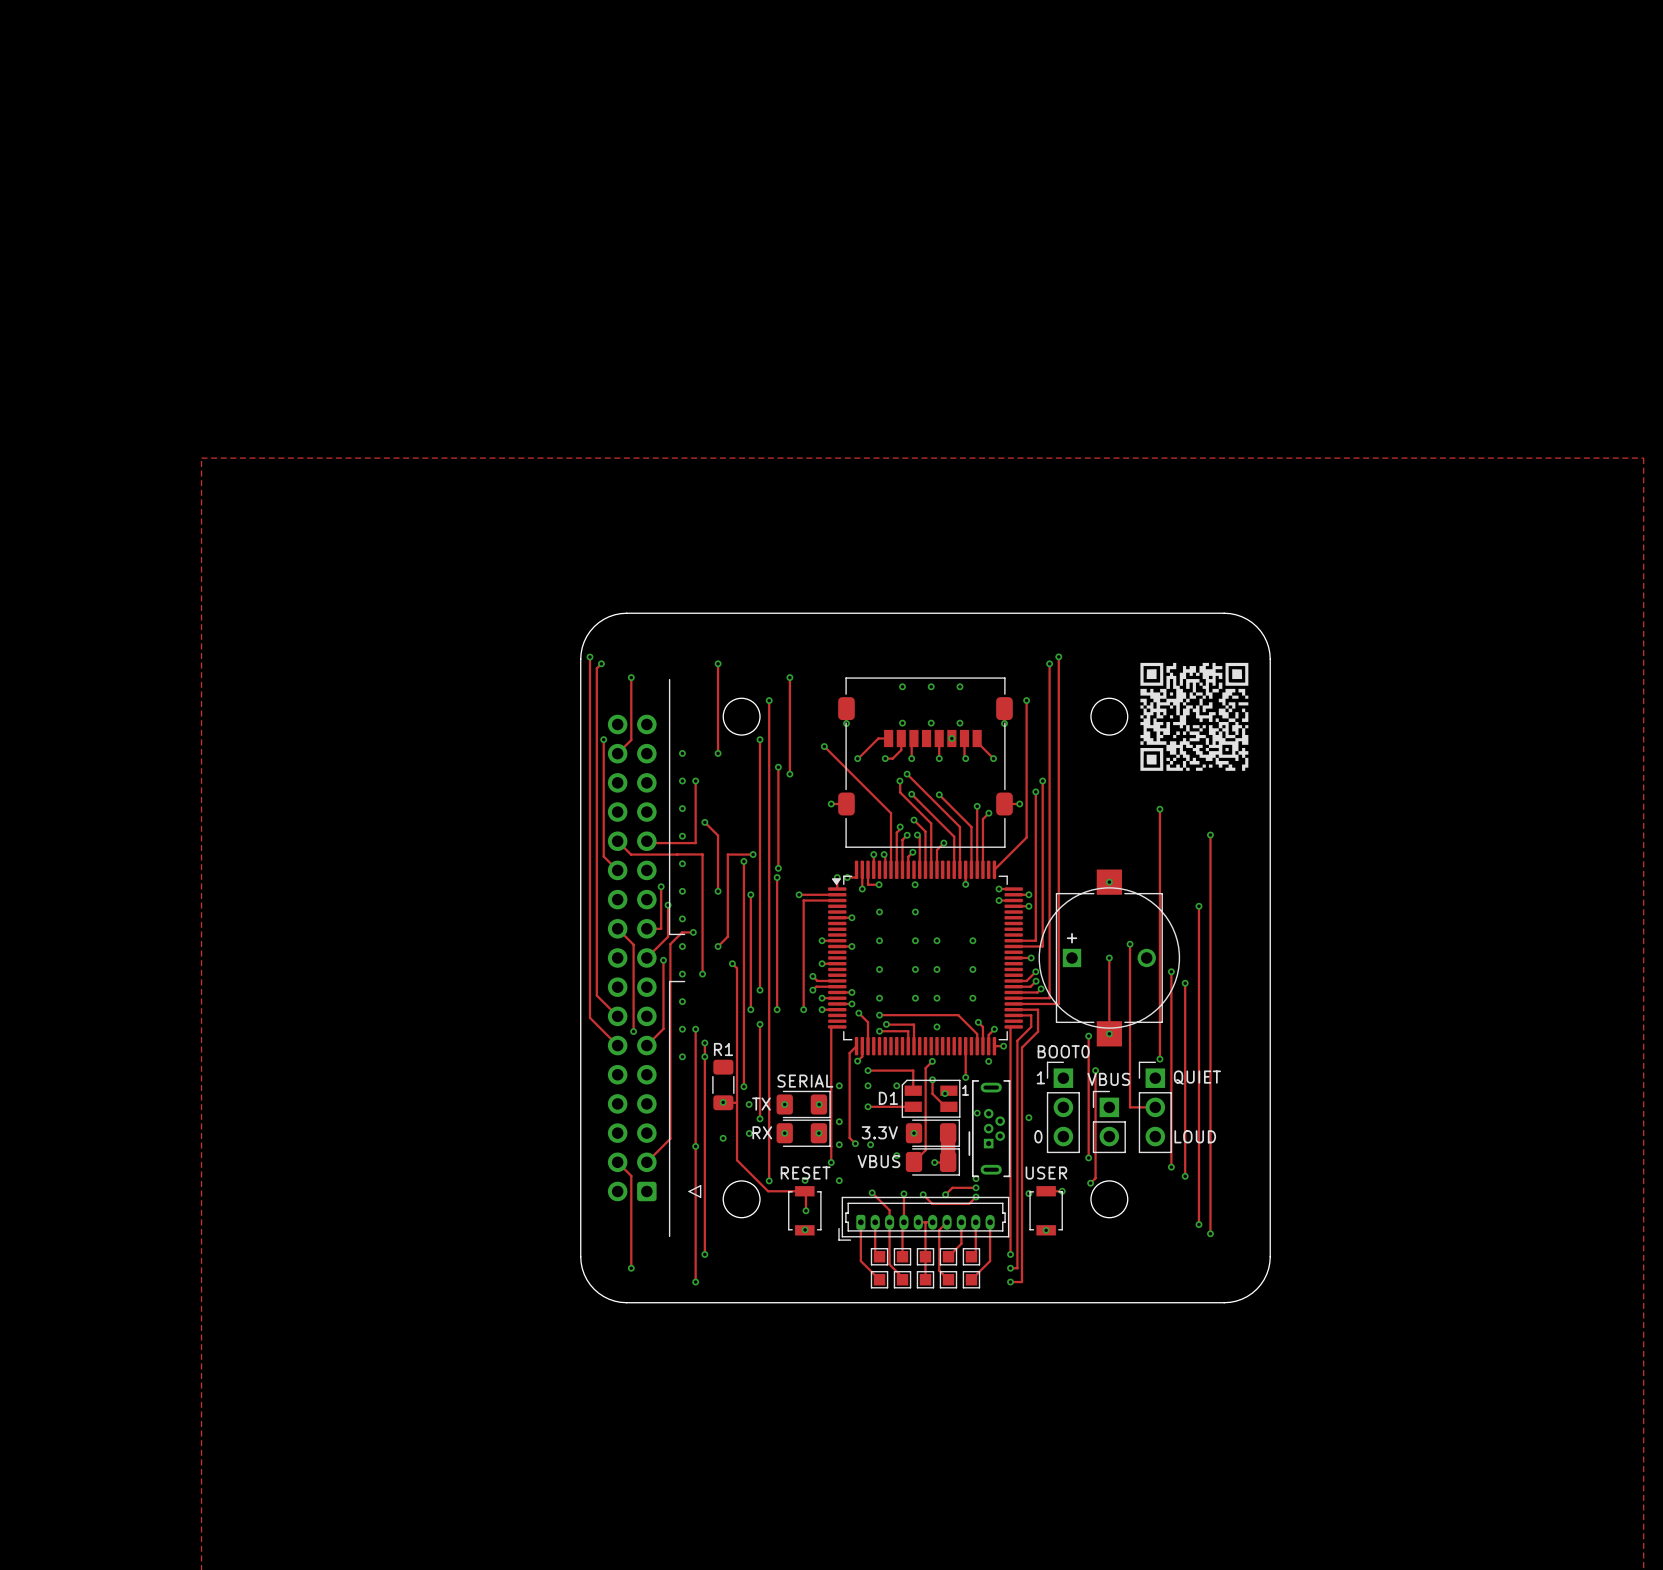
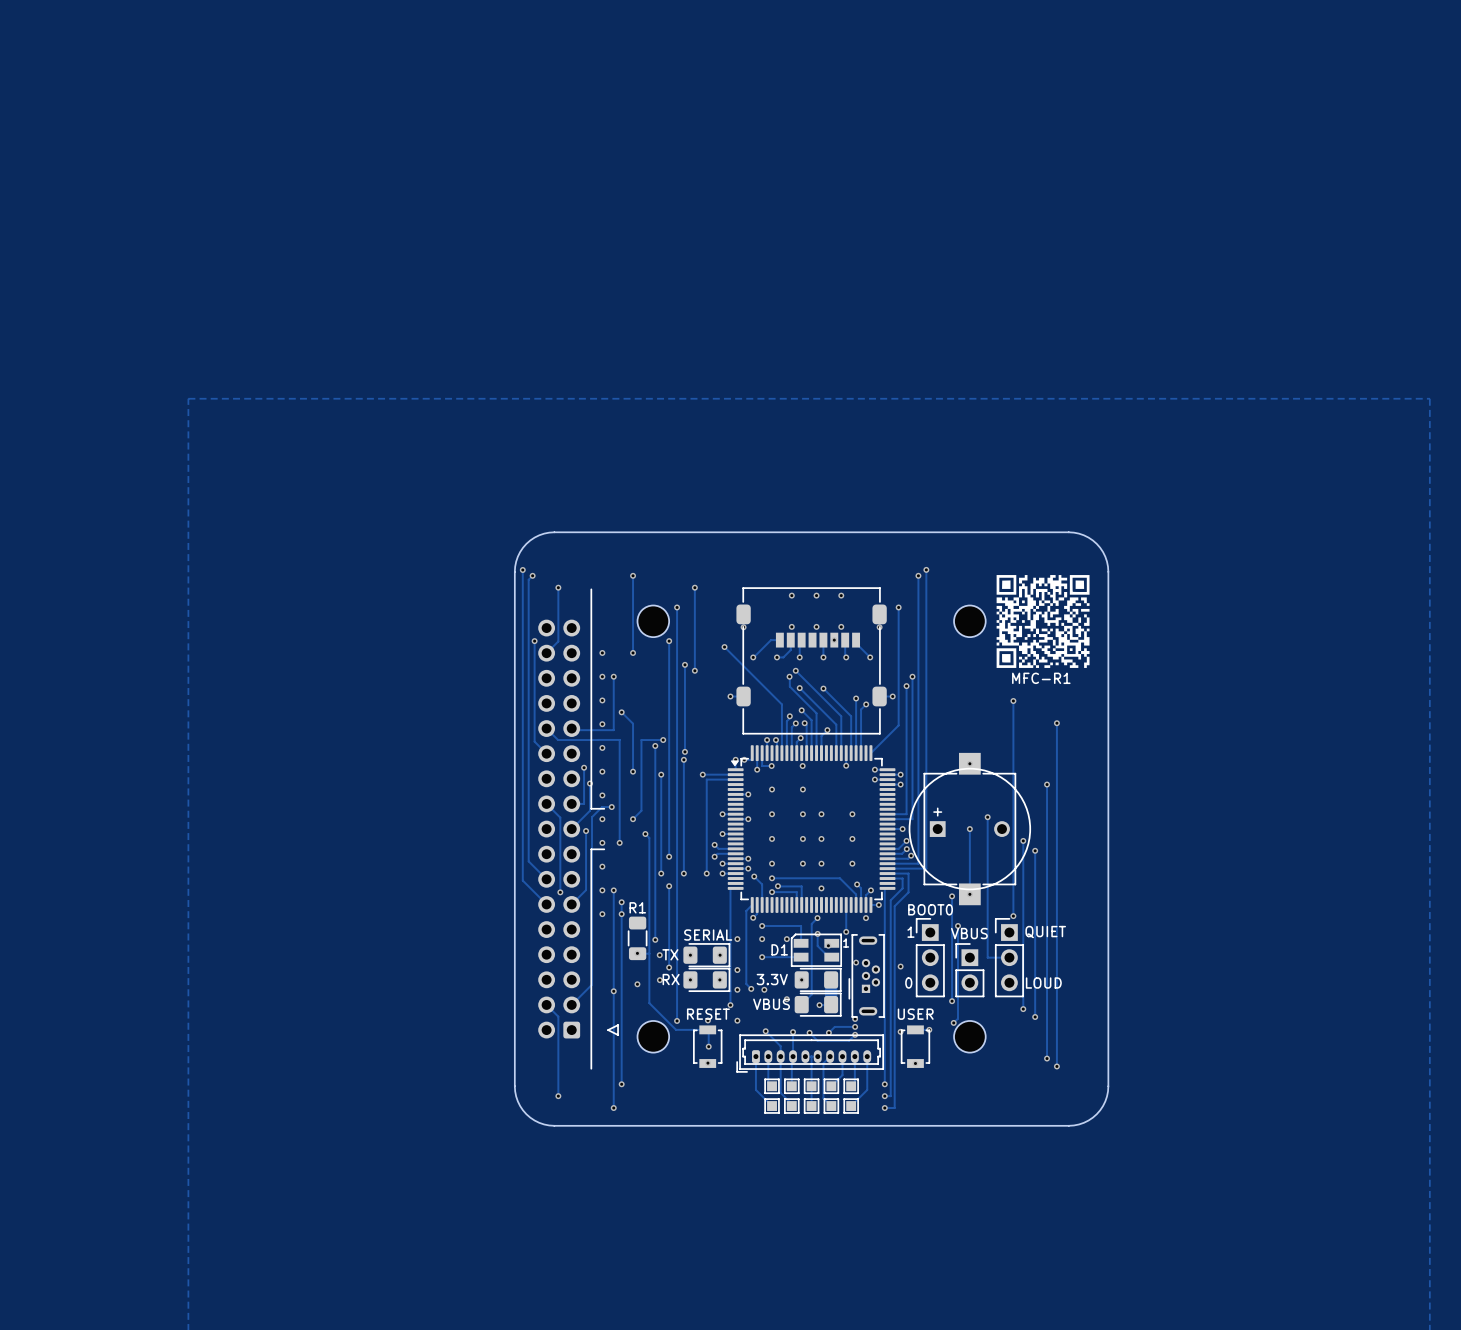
text: none -> MFC-R1 (1041, 678)

